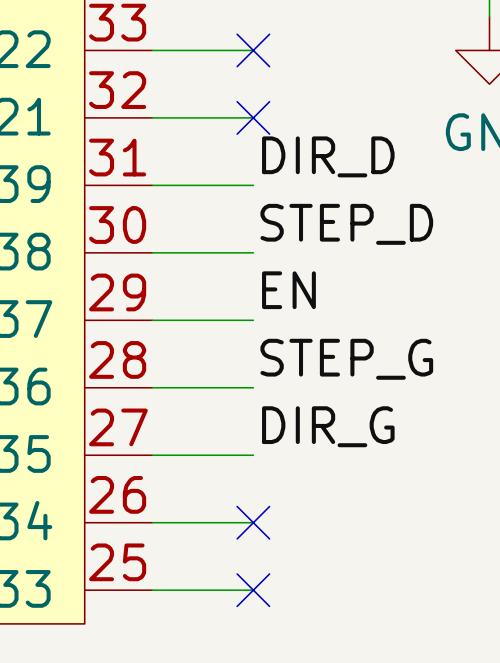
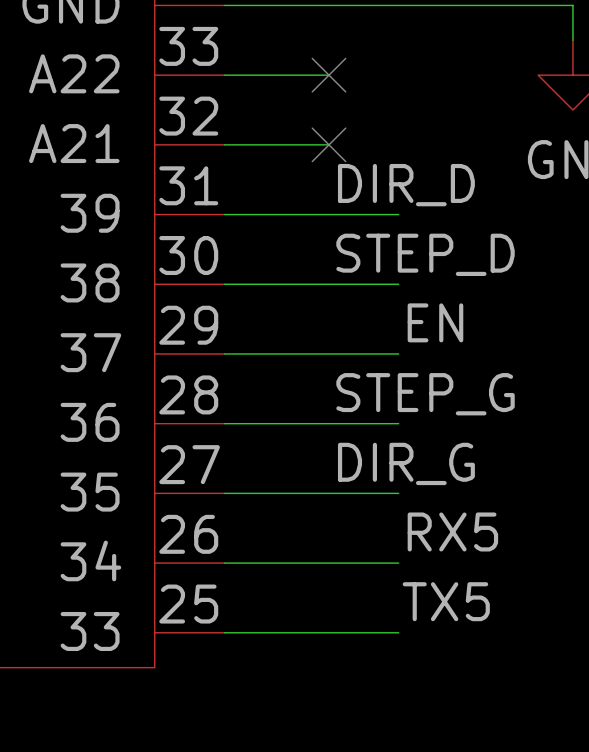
wire: none -> (328, 214) (398, 214)
wire: none -> (328, 284) (398, 284)
label position: EN (288, 290) -> EN (435, 322)
wire: none -> (328, 353) (398, 353)
wire: none -> (328, 423) (398, 423)
wire: none -> (328, 493) (398, 493)
label: none -> RX5 (452, 531)
wire: none -> (328, 563) (398, 563)
no-connect mark: (253, 522) -> none
label: none -> TX5 (446, 601)
wire: none -> (328, 632) (398, 632)
no-connect mark: (253, 590) -> none

